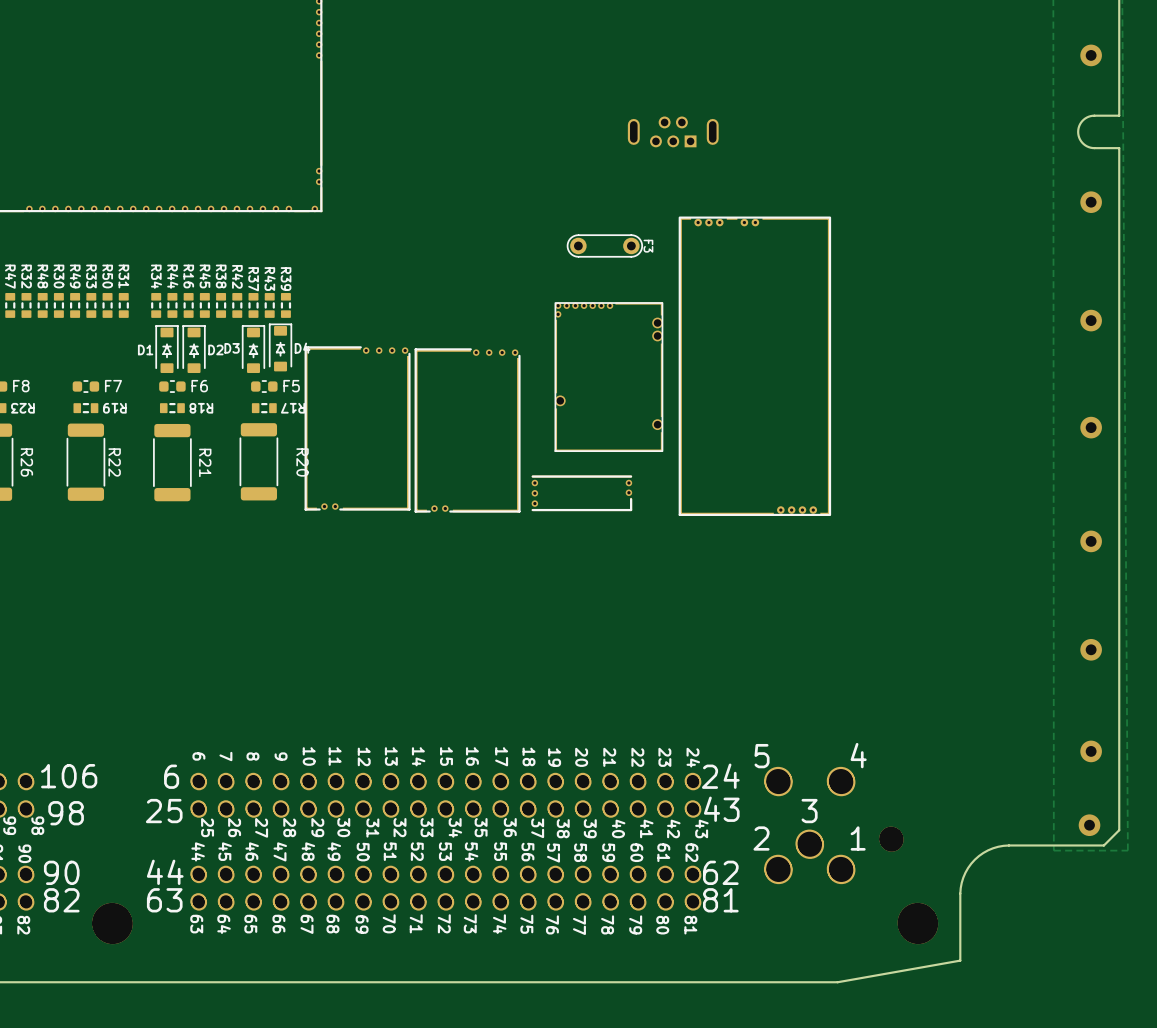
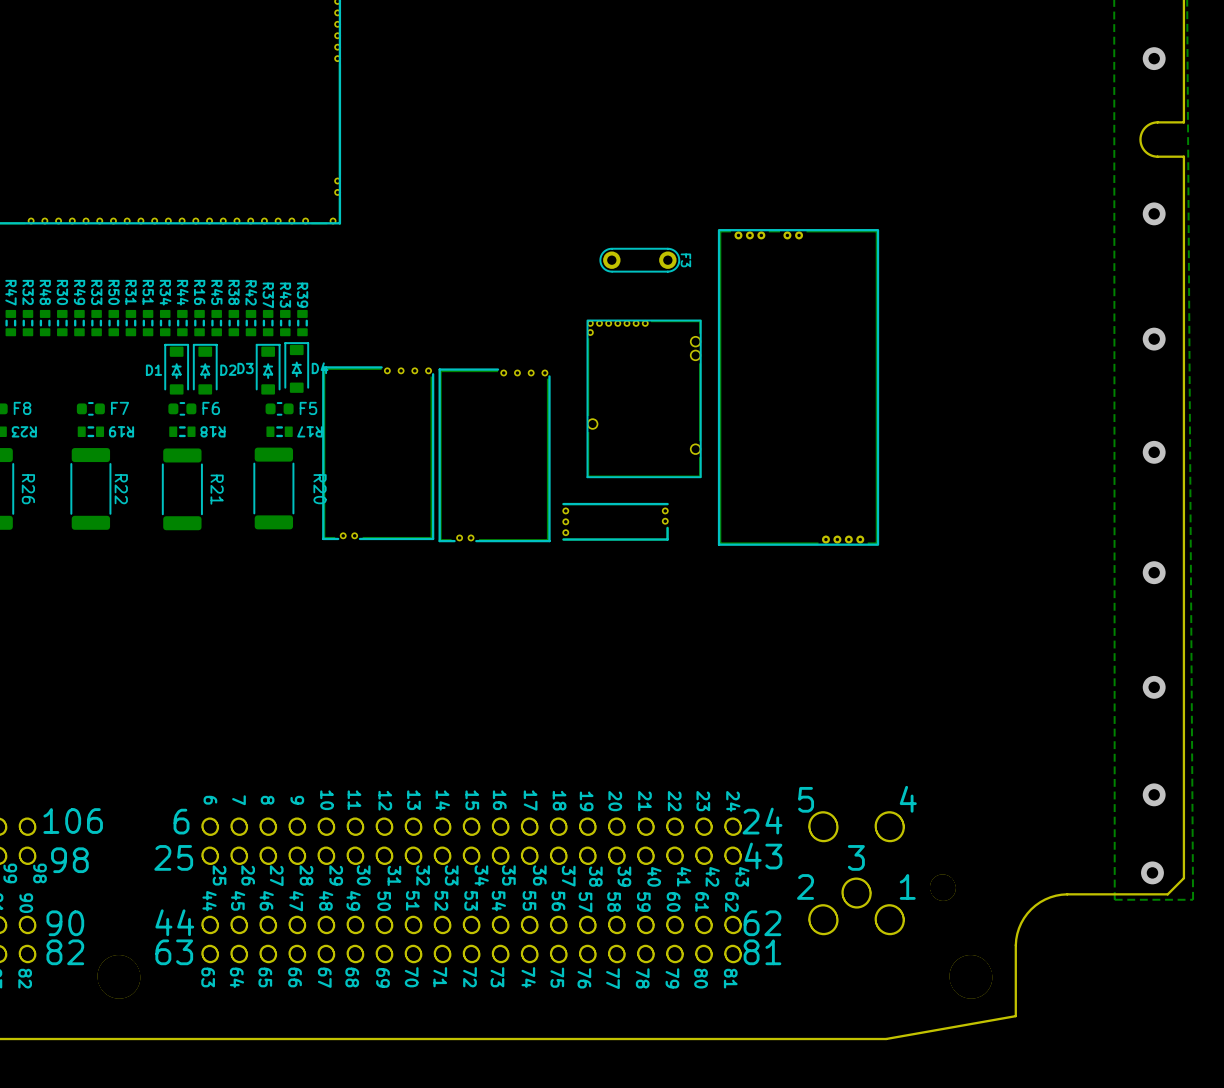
part: (673, 131) -> none
R51: none -> (148, 323)

